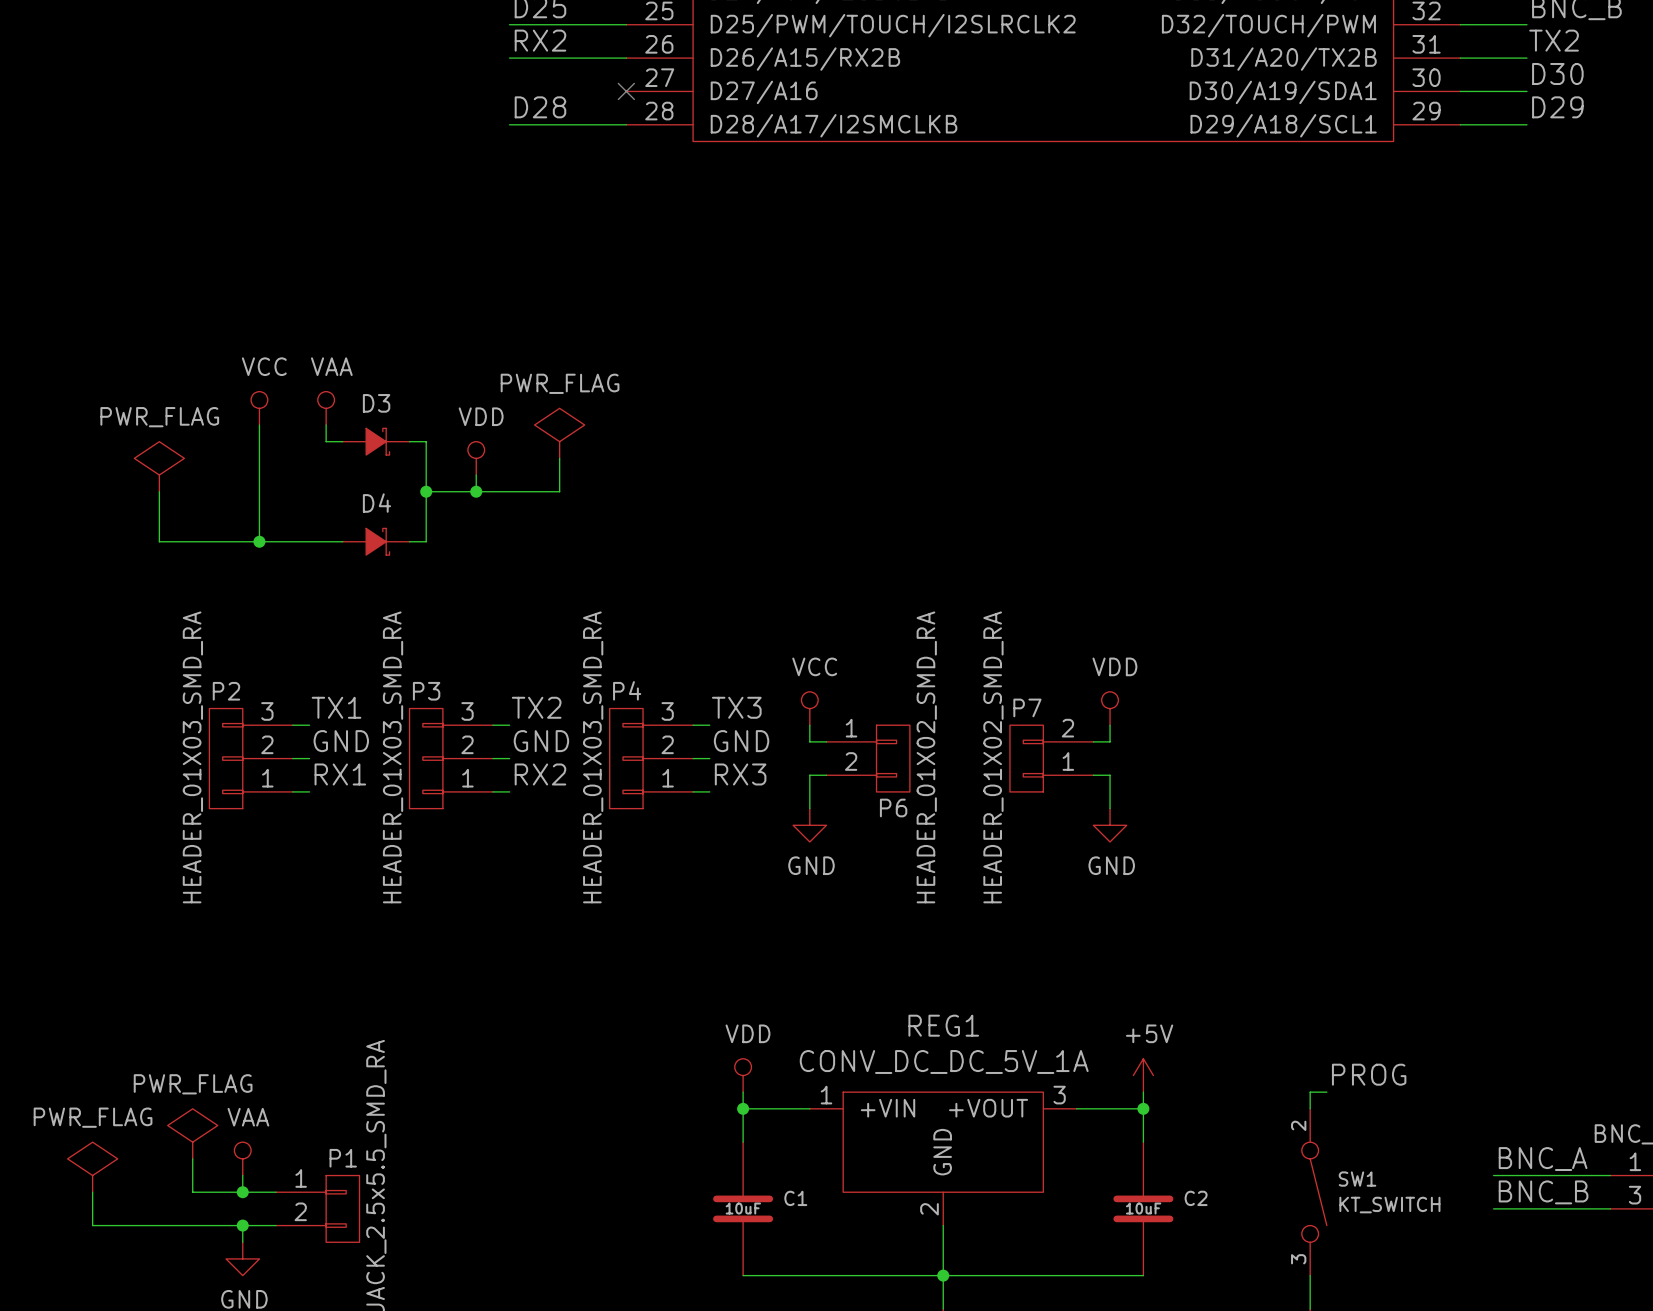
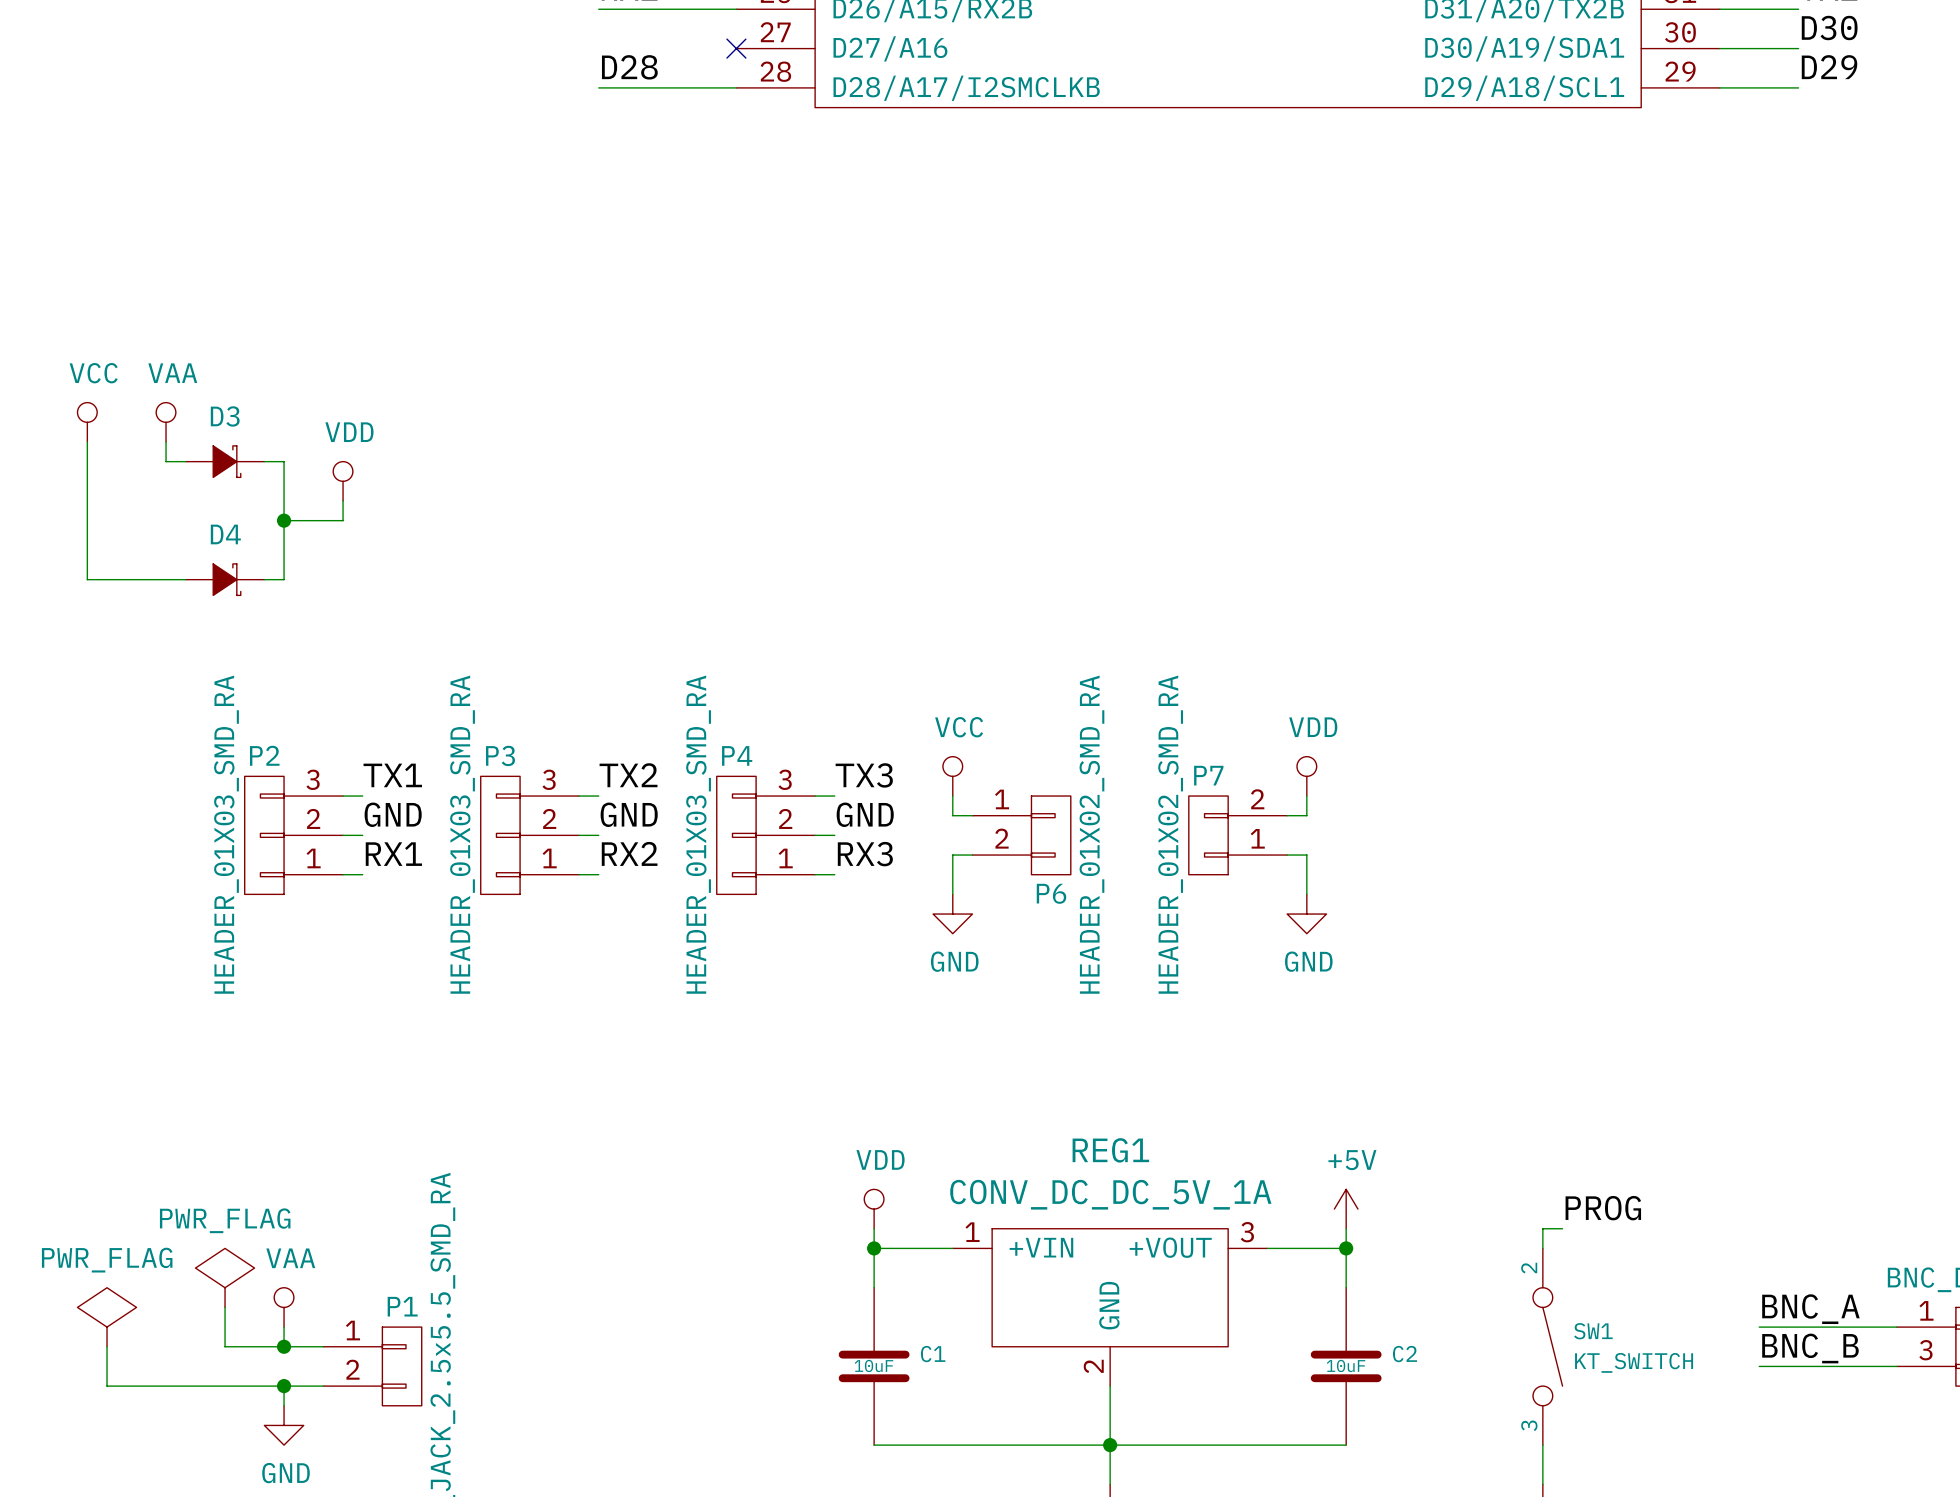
power symbol position: VCC (259, 408) -> VCC (87, 422)
power symbol position: VAA (326, 408) -> VAA (166, 422)
wire: none -> (87, 441) (87, 579) (185, 579)
wire: (259, 425) (259, 541) -> none
wire: (326, 425) (326, 441) (342, 441) -> (166, 441) (166, 461) (185, 461)
power symbol: PWR_FLAG (559, 433) -> none
D3 position: (376, 441) -> (225, 461)
wire: (409, 441) (426, 441) (426, 541) (409, 541) -> none
power symbol position: VDD (476, 458) -> VDD (343, 481)
wire: (559, 458) (559, 491) (426, 491) -> none
power symbol: PWR_FLAG (159, 466) -> none
wire: none -> (343, 500) (343, 520) (284, 520)
wire: (476, 475) (476, 491) -> none
wire: (159, 491) (159, 541) (226, 541) -> none
junction: (426, 491) -> none
junction: (476, 491) -> none
wire: (242, 541) (342, 541) -> (284, 579) (284, 461) (264, 461)
junction position: (259, 541) -> (284, 520)
D4 position: (376, 541) -> (225, 579)

